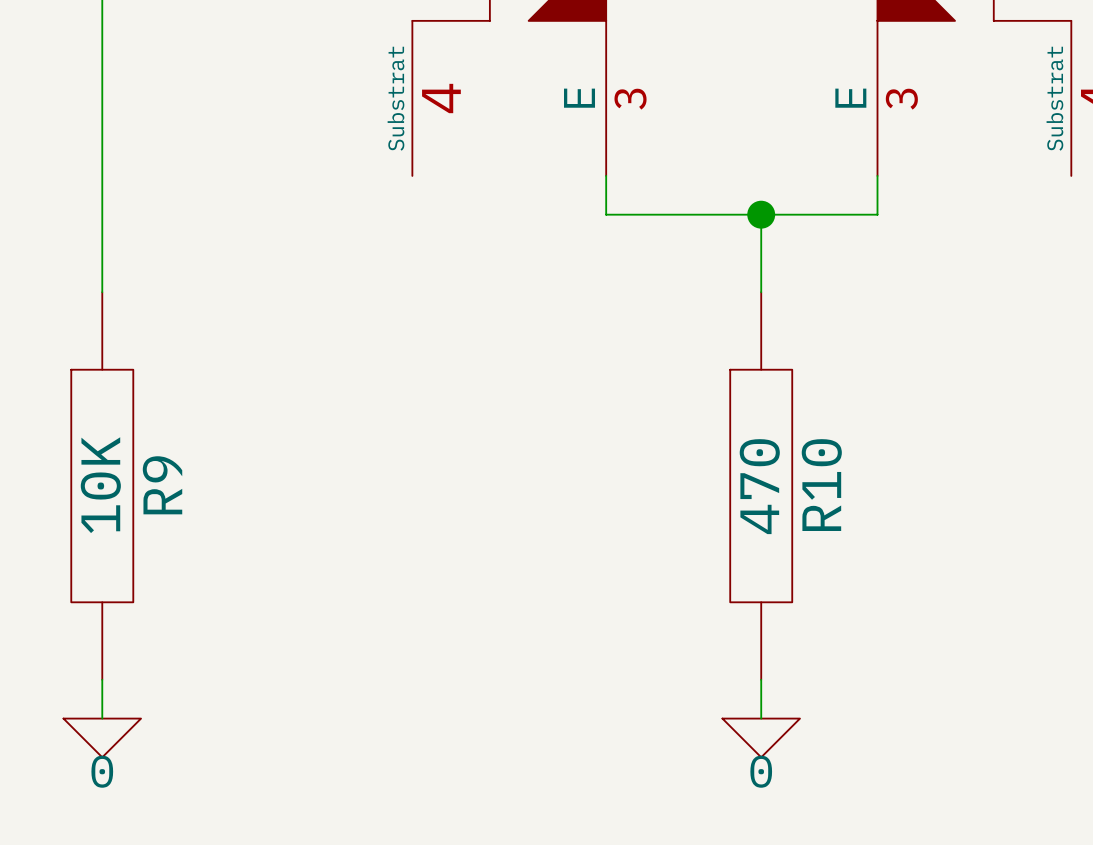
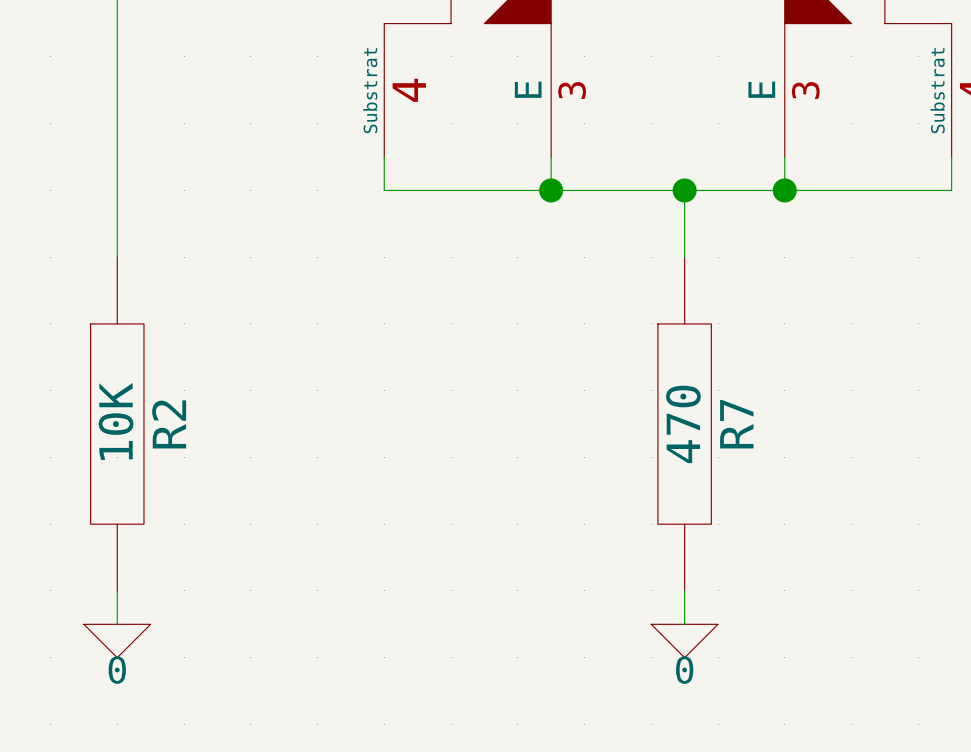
wire: none -> (384, 157) (384, 190) (551, 190)
wire: none -> (951, 157) (951, 190) (784, 190)
junction: none -> (551, 190)
junction: none -> (784, 190)
R9 name: R9 (162, 485) -> R2 (169, 424)
R10 name: R10 (821, 485) -> R7 (736, 424)

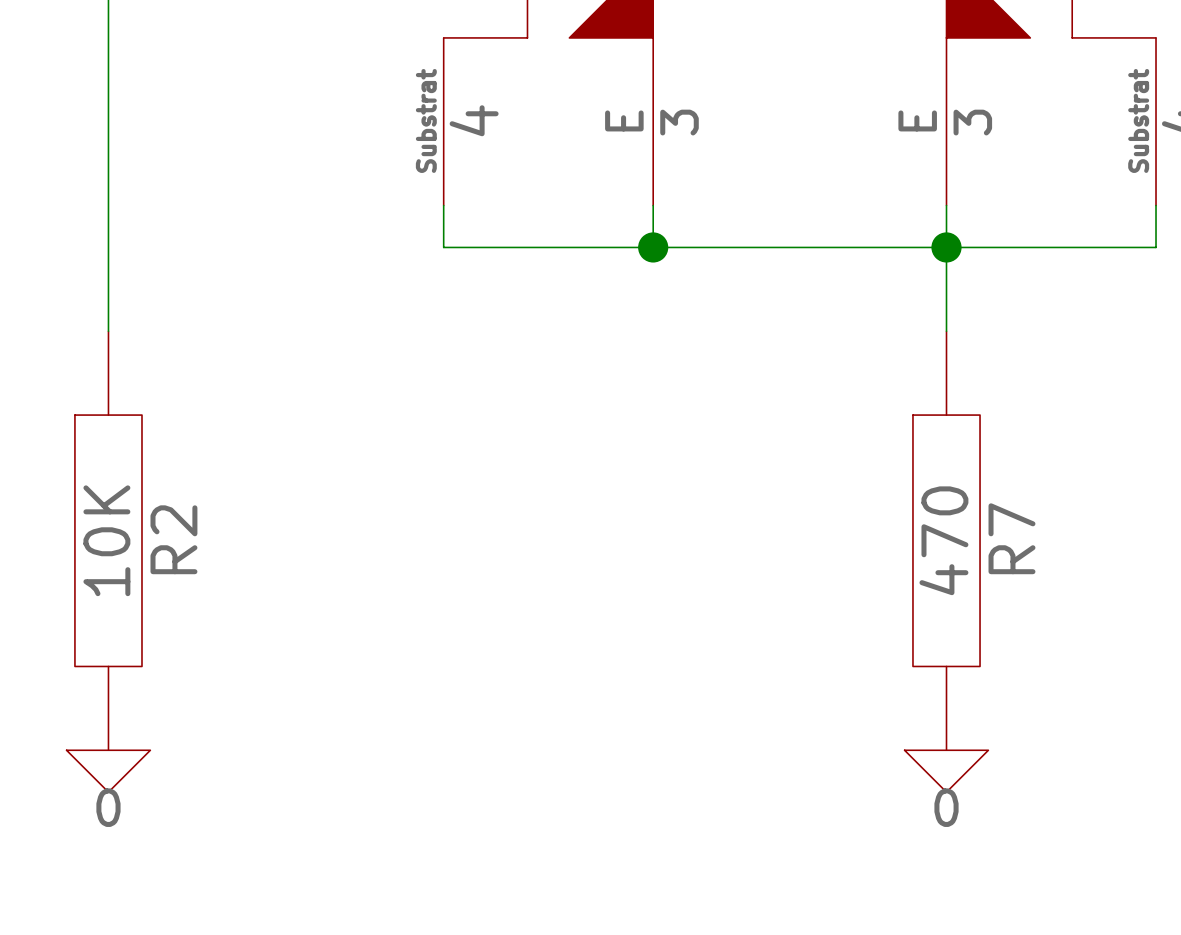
wire: (684, 190) (684, 257) -> (946, 247) (946, 331)
junction: (684, 190) -> none
R7 position: (684, 424) -> (946, 540)
wire: (117, 590) (117, 624) -> none
wire: (684, 590) (684, 624) -> none
power symbol position: 0 (117, 641) -> 0 (108, 771)
power symbol position: 0 (684, 641) -> 0 (946, 771)

